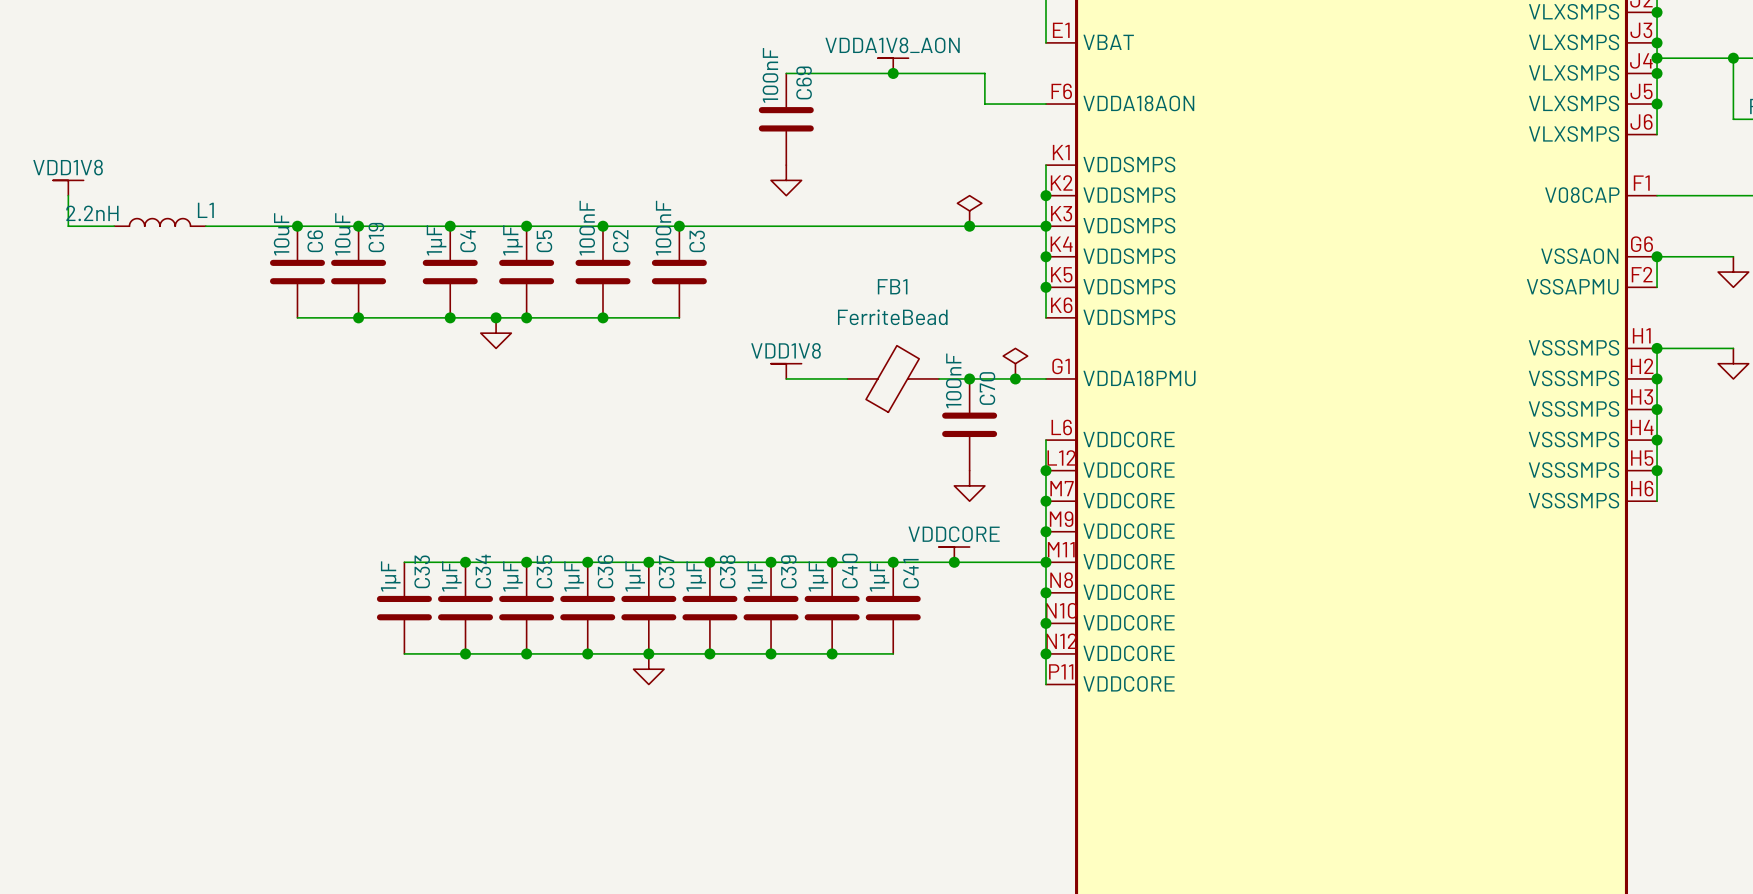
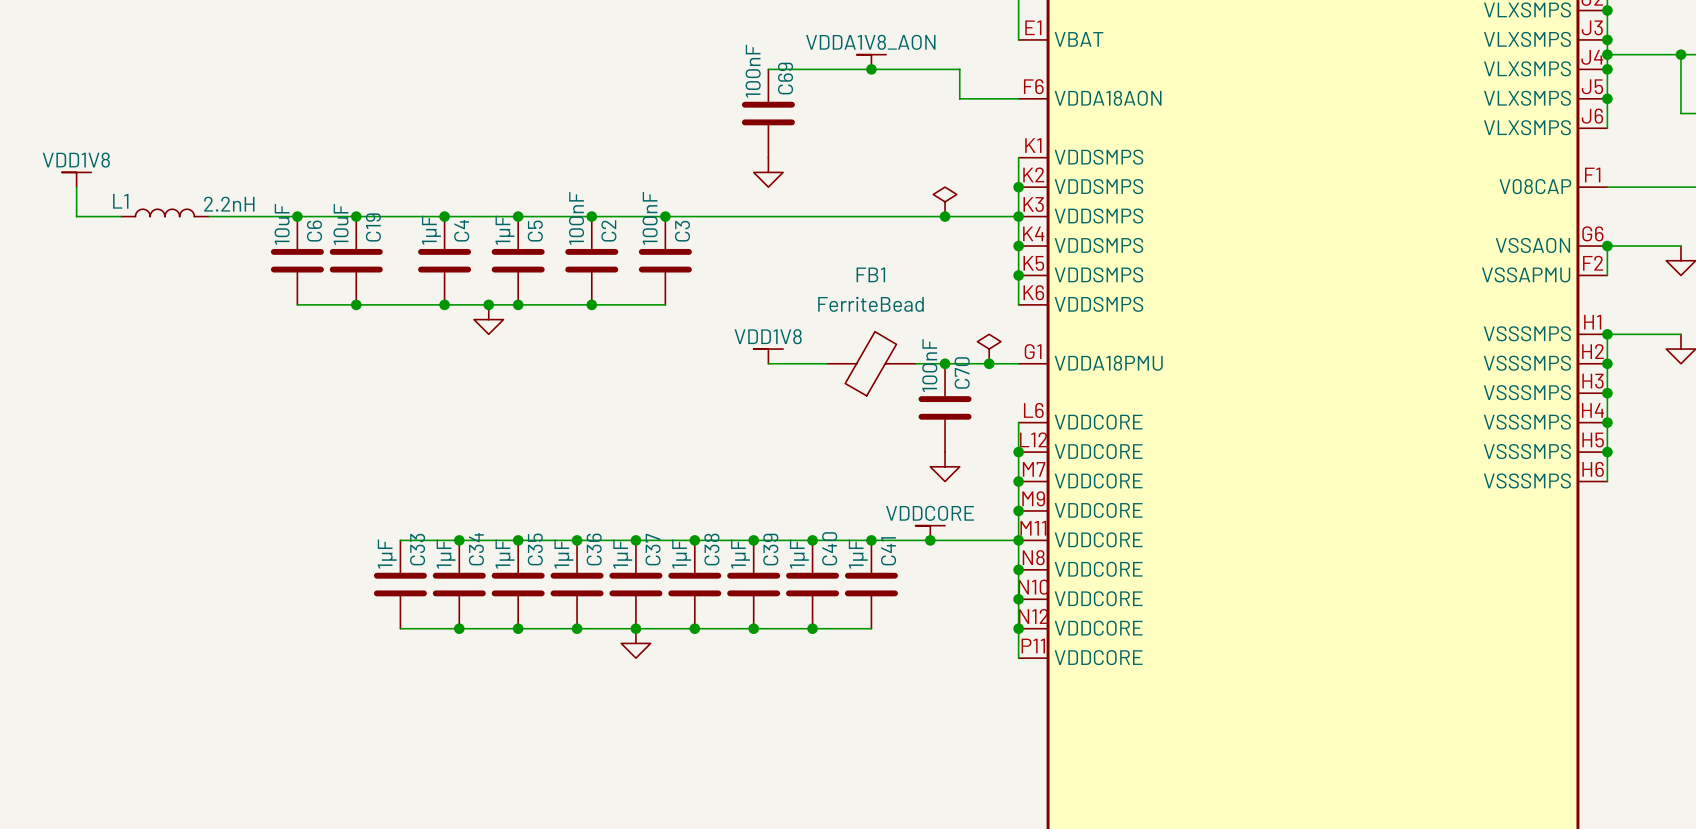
L1 name position: L1 (205, 210) -> L1 (120, 201)
L1 value position: 2.2nH (92, 213) -> 2.2nH (229, 204)

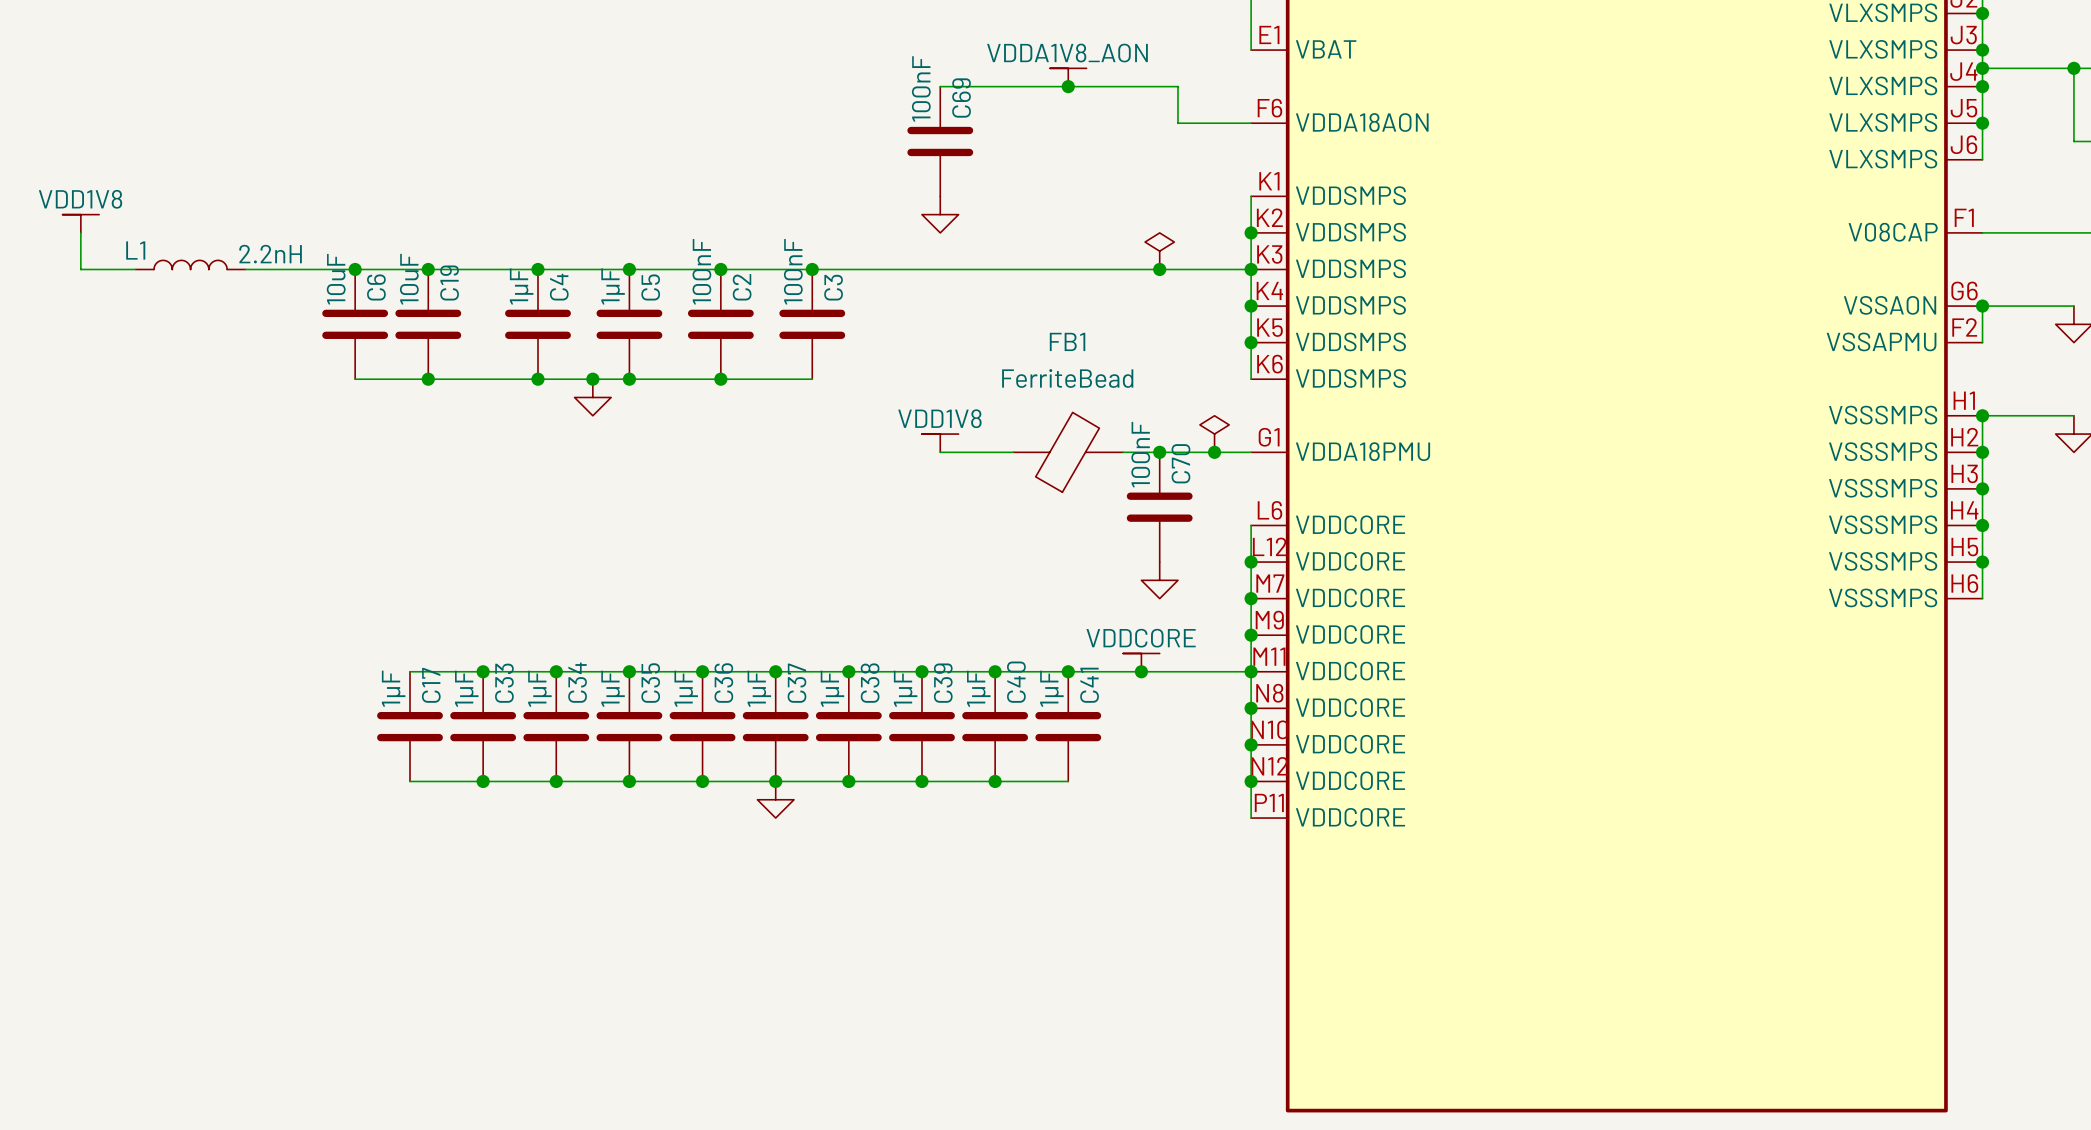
wire: none -> (410, 671) (483, 671)
junction: none -> (483, 671)
C17: none -> 1µF (410, 726)
wire: none -> (410, 781) (483, 781)
junction: none -> (483, 781)

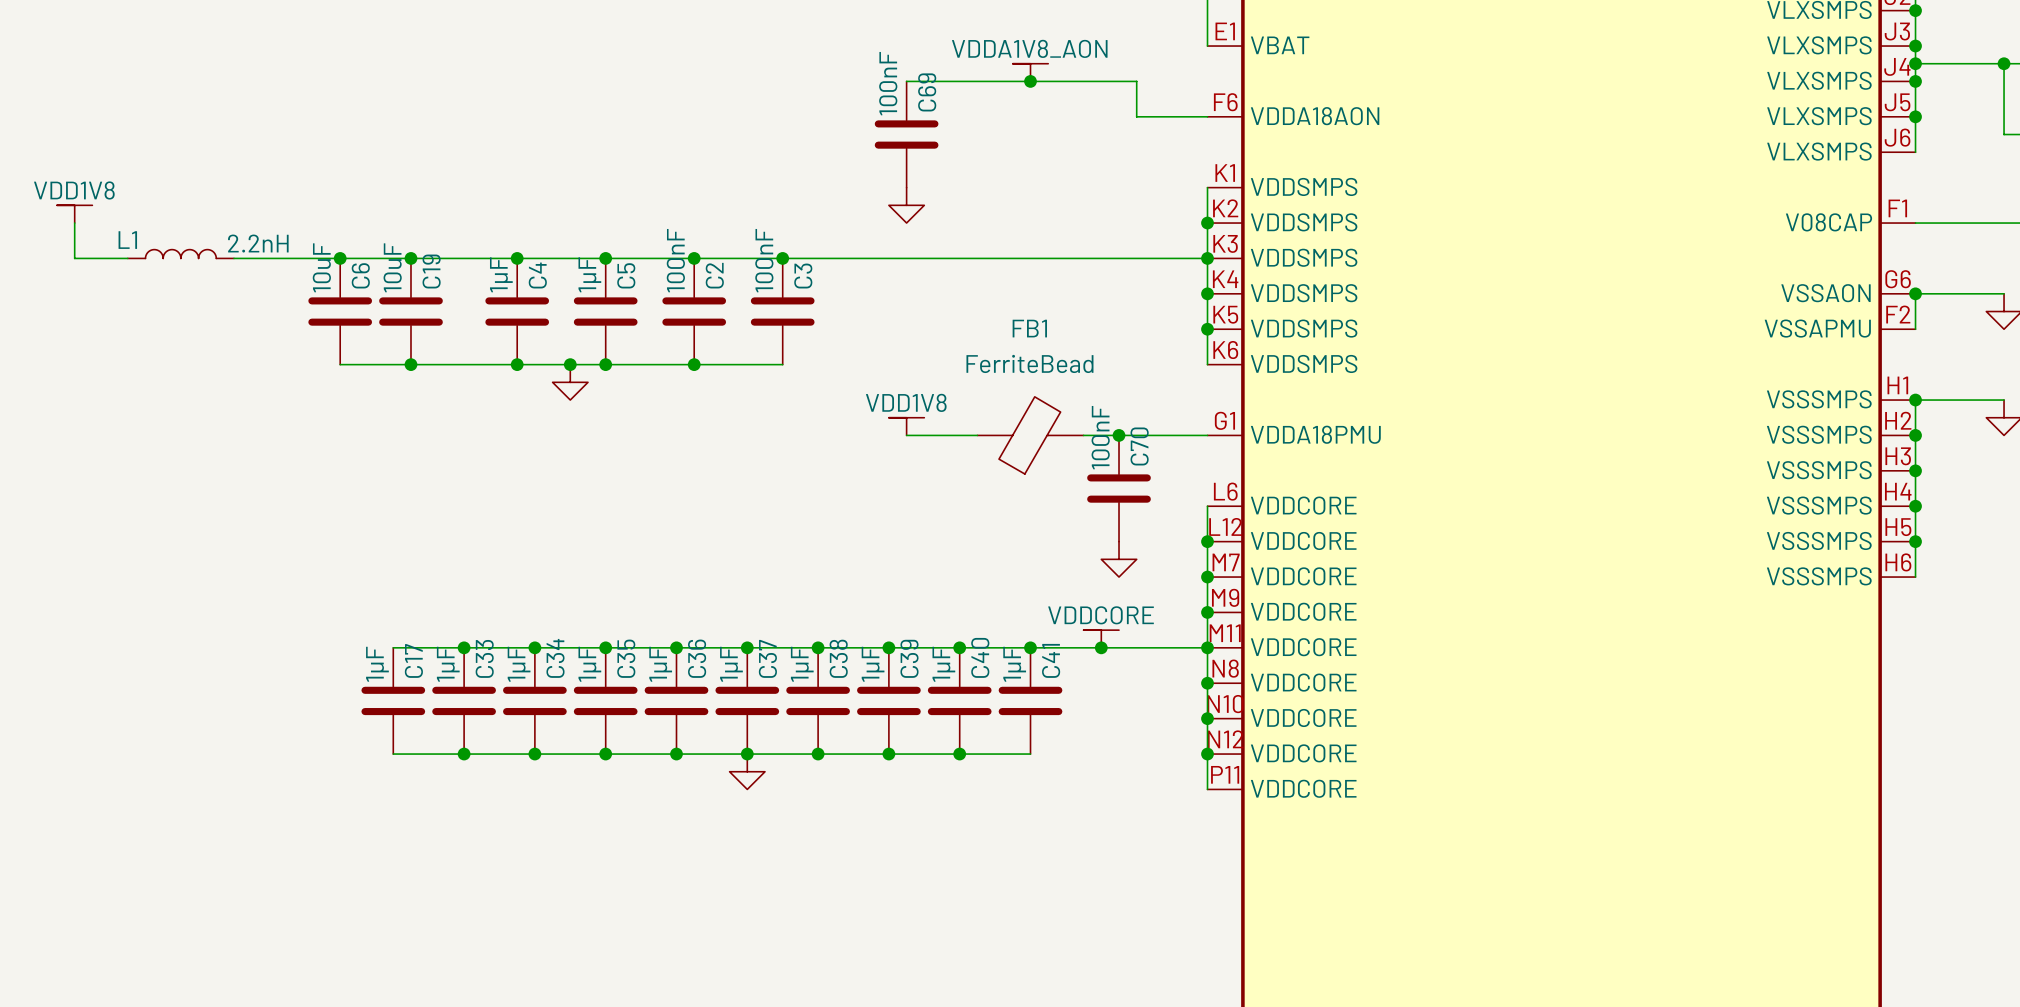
power symbol: (1159, 251) -> none
junction: (1159, 269) -> none
power symbol: (1214, 434) -> none
junction: (1214, 452) -> none

